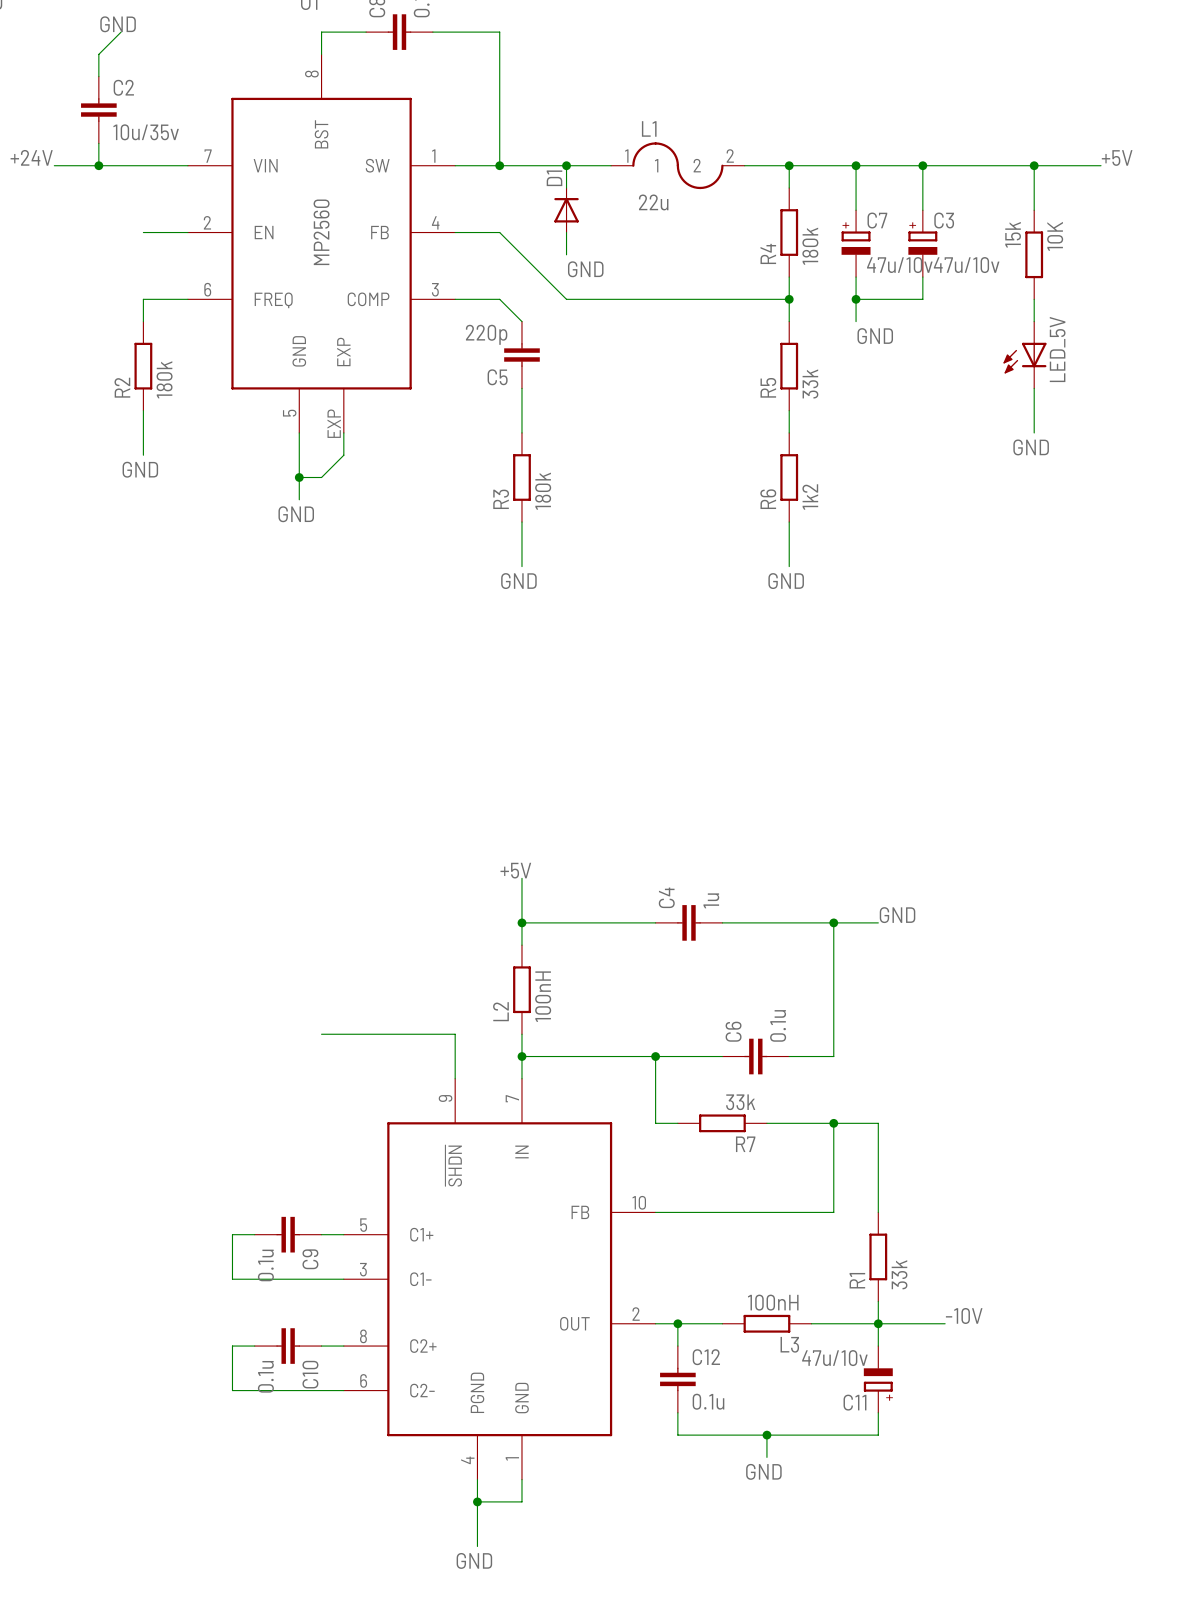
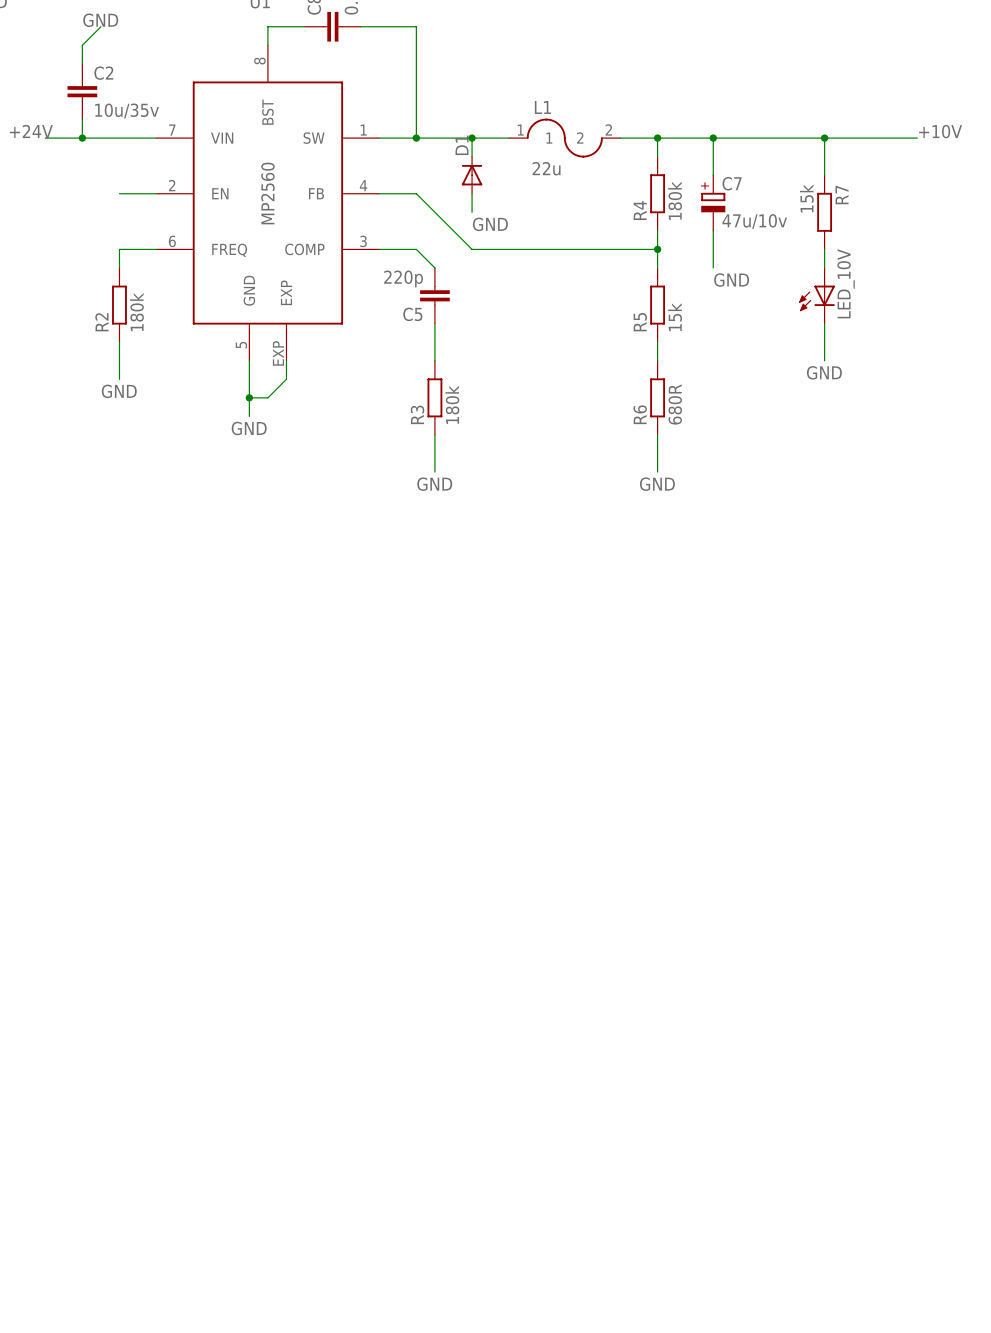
label: +5V (1117, 158) -> +10V (940, 131)
wire: (922, 165) (922, 210) -> none
junction: (922, 165) -> none
junction: none -> (824, 138)
wire: (1034, 165) (1034, 210) -> (824, 138) (824, 175)
junction: (1034, 165) -> none
C3: 47u/10v (922, 243) -> none
10K: 15k (1034, 254) -> none
wire: (922, 277) (922, 299) (856, 299) -> none
junction: (856, 299) -> none
wire: (1034, 299) (1034, 321) -> (824, 249) (824, 267)
LED_10V: none -> (816, 295)
LED_5V: (1024, 355) -> none
R5 value: 33k (810, 384) -> 15k (675, 317)
wire: (1034, 388) (1034, 432) -> (824, 323) (824, 360)
label position: GND (1031, 447) -> GND (824, 372)
R6 value: 1k2 (810, 497) -> 680R (675, 404)
label: +5V (515, 870) -> none
wire: (521, 878) (521, 945) -> none
label: GND (897, 915) -> none
wire: (521, 922) (655, 922) -> none
junction: (521, 922) -> none
C4: 1u (689, 922) -> none
wire: (722, 922) (878, 922) -> none
wire: (833, 922) (833, 1056) (789, 1056) -> none
junction: (833, 922) -> none
L2: 100nH (521, 989) -> none
wire: (321, 1034) (455, 1034) (455, 1078) -> none
wire: (521, 1034) (521, 1078) -> none
wire: (521, 1056) (722, 1056) -> none
junction: (521, 1056) -> none
wire: (655, 1056) (655, 1123) (677, 1123) -> none
junction: (655, 1056) -> none
C6: 0.1u (755, 1056) -> none
R7 value: 33k (740, 1102) -> 15k (806, 198)
R7 rotation: 0° (722, 1123) -> 90° clockwise (824, 212)
R7 position: (722, 1123) -> (824, 212)
wire: (766, 1123) (878, 1123) (878, 1212) -> none
wire: (833, 1123) (833, 1212) (655, 1212) -> none
junction: (833, 1123) -> none
R7 name position: R7 (745, 1144) -> R7 (842, 195)
wire: (254, 1234) (232, 1234) (232, 1279) (343, 1279) -> none
C9: 0.1u (288, 1234) -> none
wire: (321, 1234) (343, 1234) -> none
R1: 33k (878, 1256) -> none
part: (499, 1279) -> none
wire: (878, 1301) (878, 1346) -> none
label: -10V (964, 1315) -> none
wire: (655, 1323) (722, 1323) -> none
wire: (677, 1323) (677, 1346) -> none
junction: (677, 1323) -> none
L3: 100nH (766, 1323) -> none
wire: (811, 1323) (945, 1323) -> none
junction: (878, 1323) -> none
wire: (254, 1346) (232, 1346) (232, 1390) (343, 1390) -> none
C10: 0.1u (288, 1346) -> none
wire: (321, 1346) (343, 1346) -> none
C12: 0.1u (677, 1379) -> none
C11: 47u/10v (878, 1379) -> none
wire: (677, 1412) (677, 1435) (878, 1435) (878, 1412) -> none
wire: (766, 1435) (766, 1457) -> none
junction: (766, 1435) -> none
label: GND (763, 1471) -> none
wire: (477, 1479) (477, 1546) -> none
wire: (521, 1479) (521, 1501) (477, 1501) -> none
junction: (477, 1501) -> none
label: GND (474, 1560) -> none

